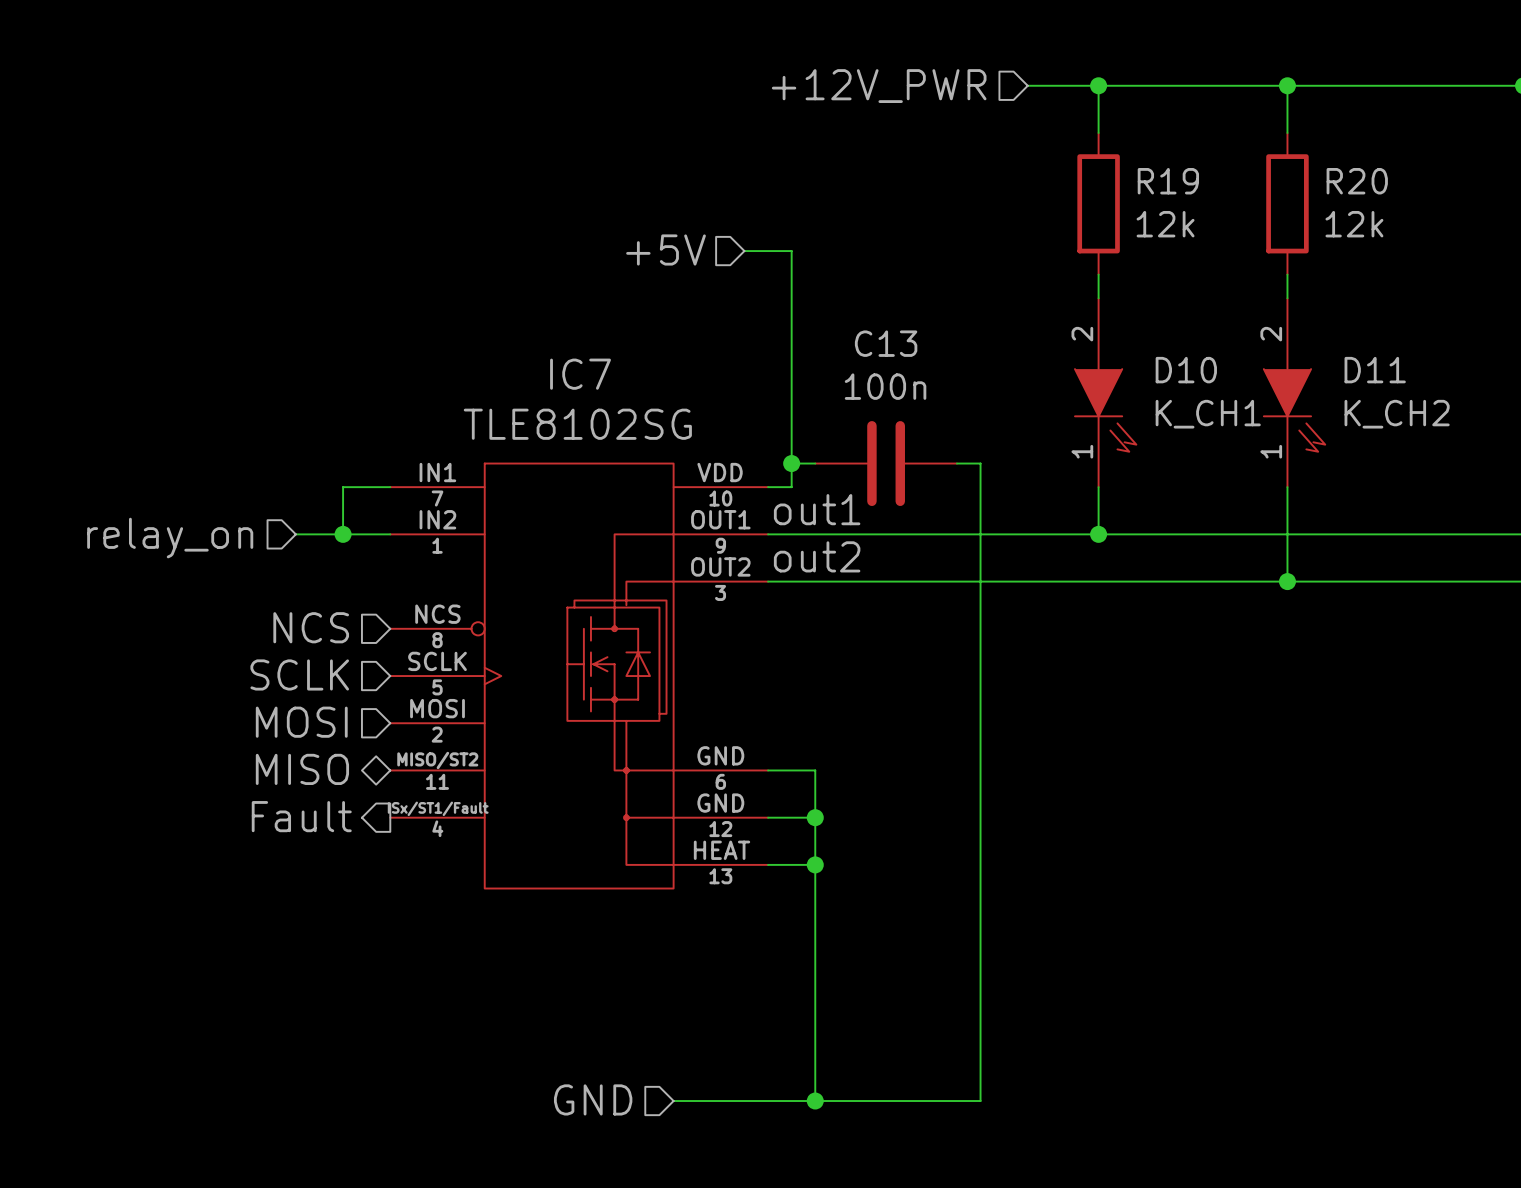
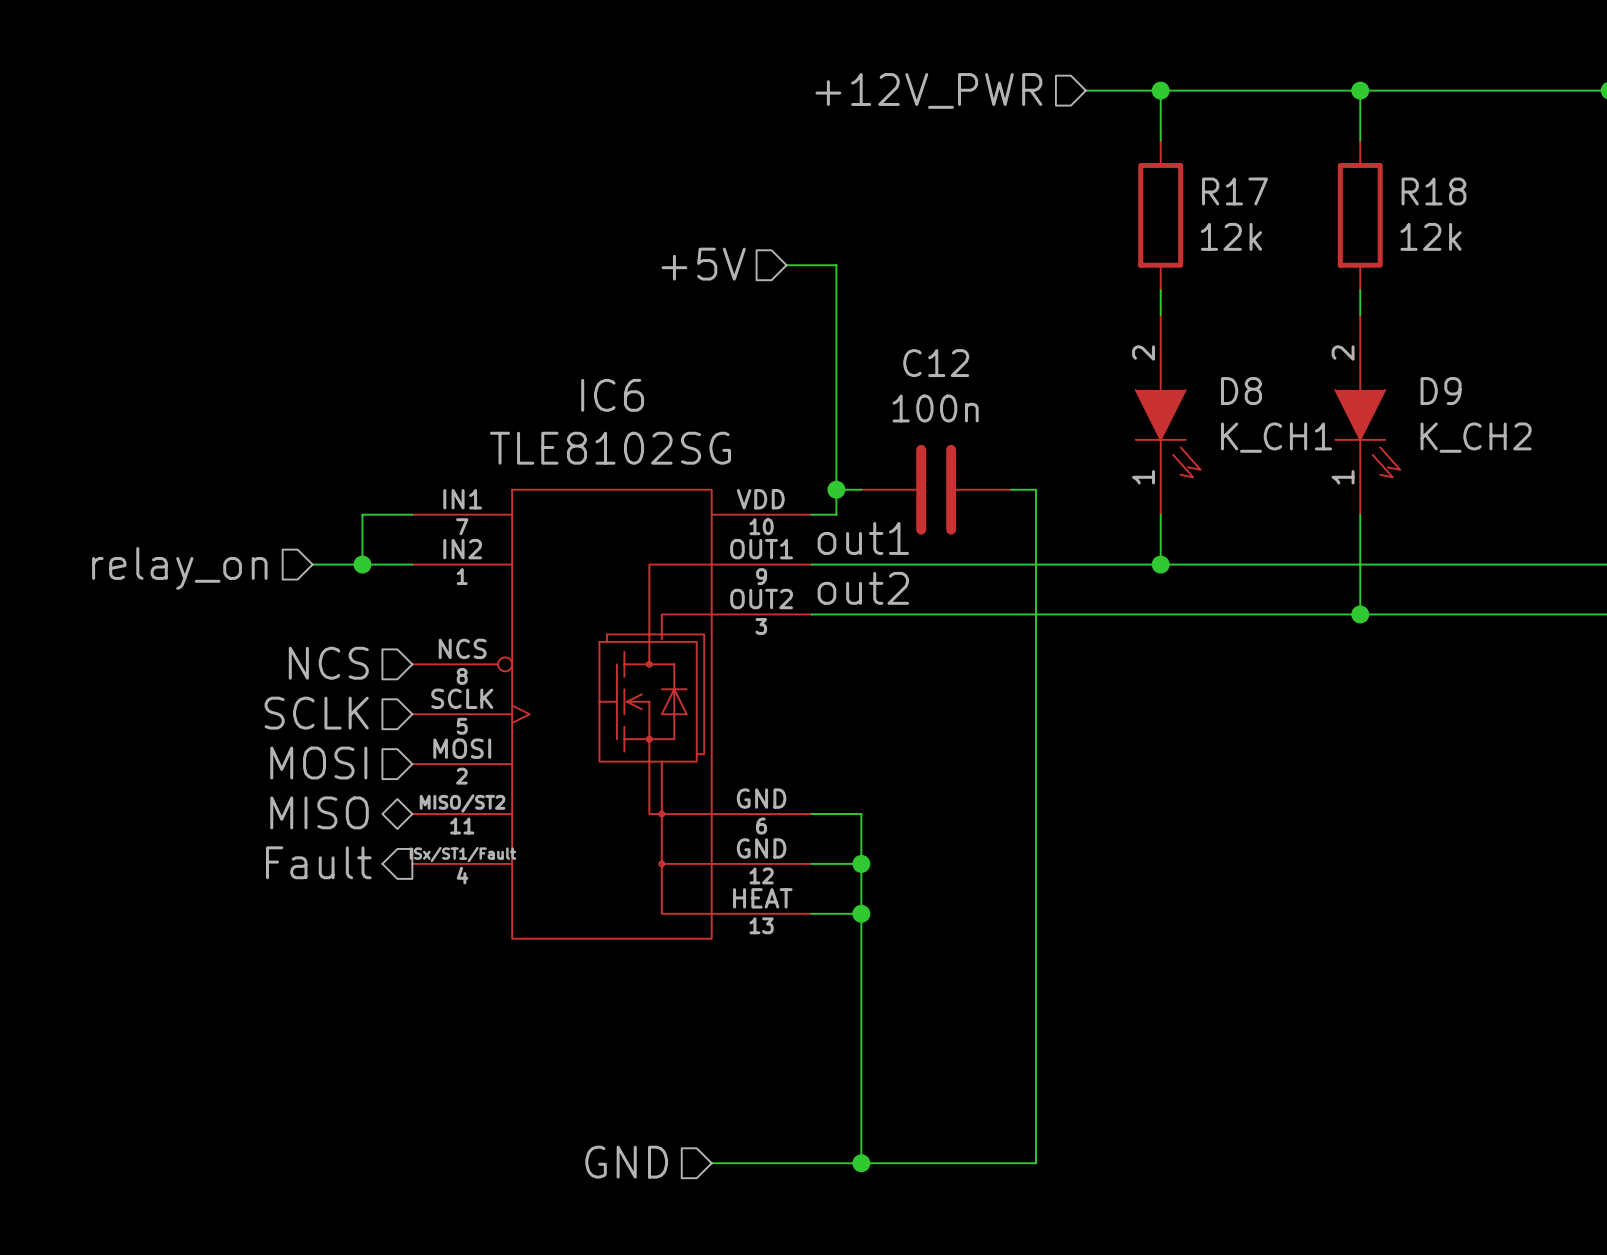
R19 name: R19 (1168, 181) -> R17 (1235, 191)
R20 name: R20 (1357, 181) -> R18 (1433, 191)
C13 name: C13 (886, 343) -> C12 (936, 363)
D10 name: D10 (1186, 370) -> D8 (1241, 391)
D11 name: D11 (1375, 370) -> D9 (1441, 391)
IC7 name: IC7 (580, 374) -> IC6 (612, 395)

